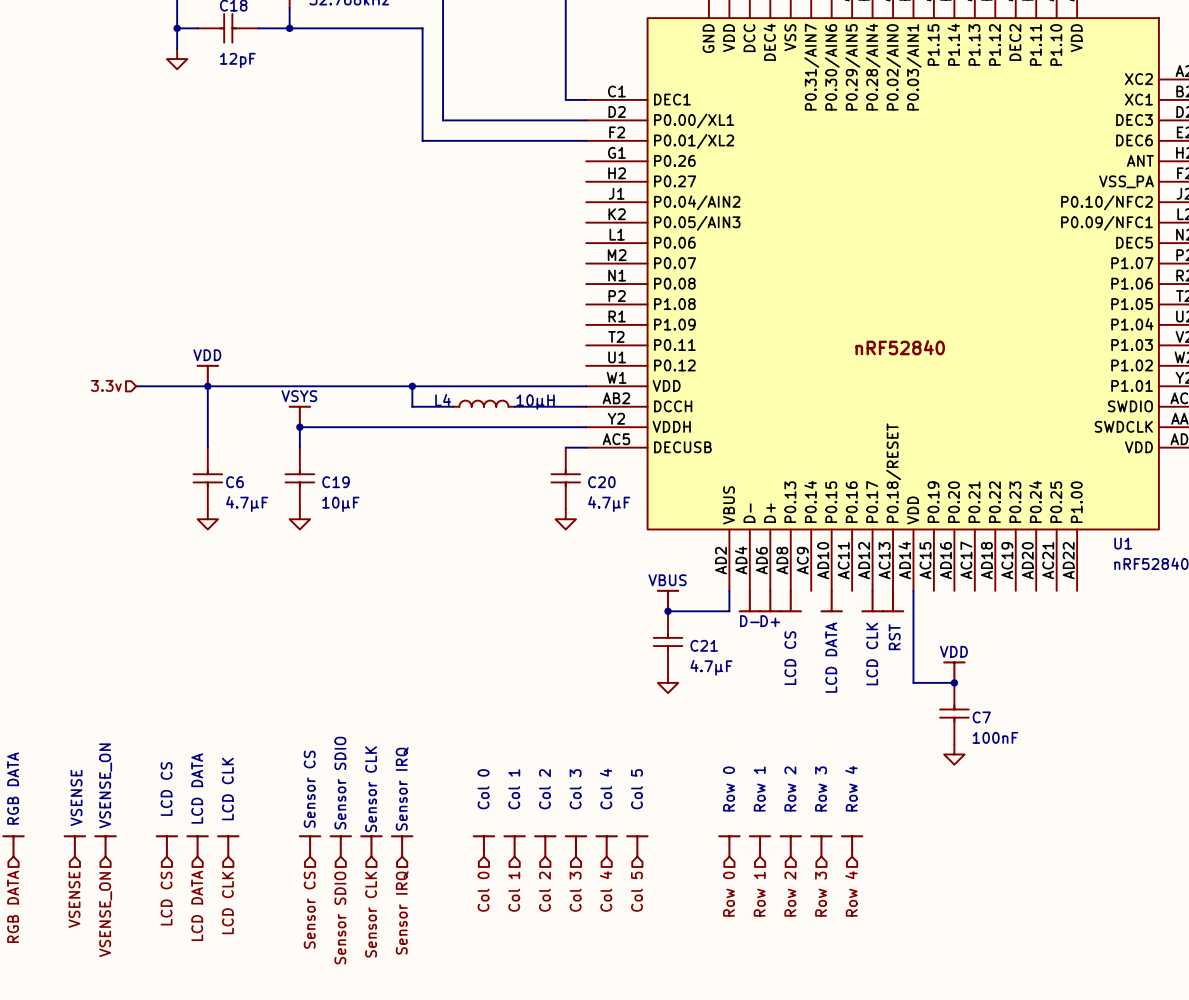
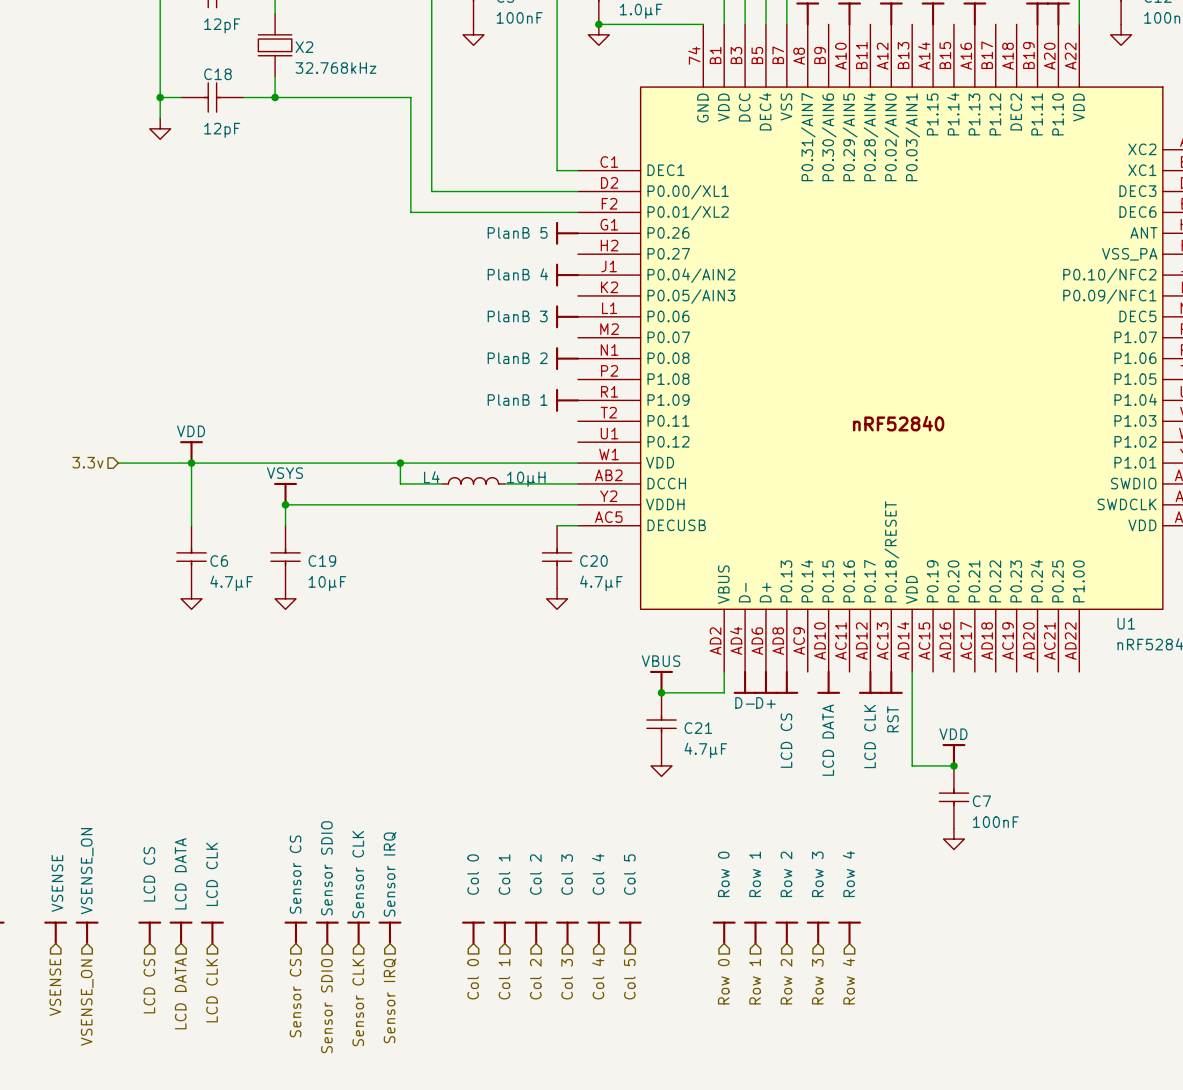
power symbol: none -> PlanB 5 (567, 233)
power symbol: none -> PlanB 4 (567, 275)
power symbol: none -> PlanB 3 (567, 316)
power symbol: none -> PlanB 2 (567, 358)
power symbol: none -> PlanB 1 (567, 400)

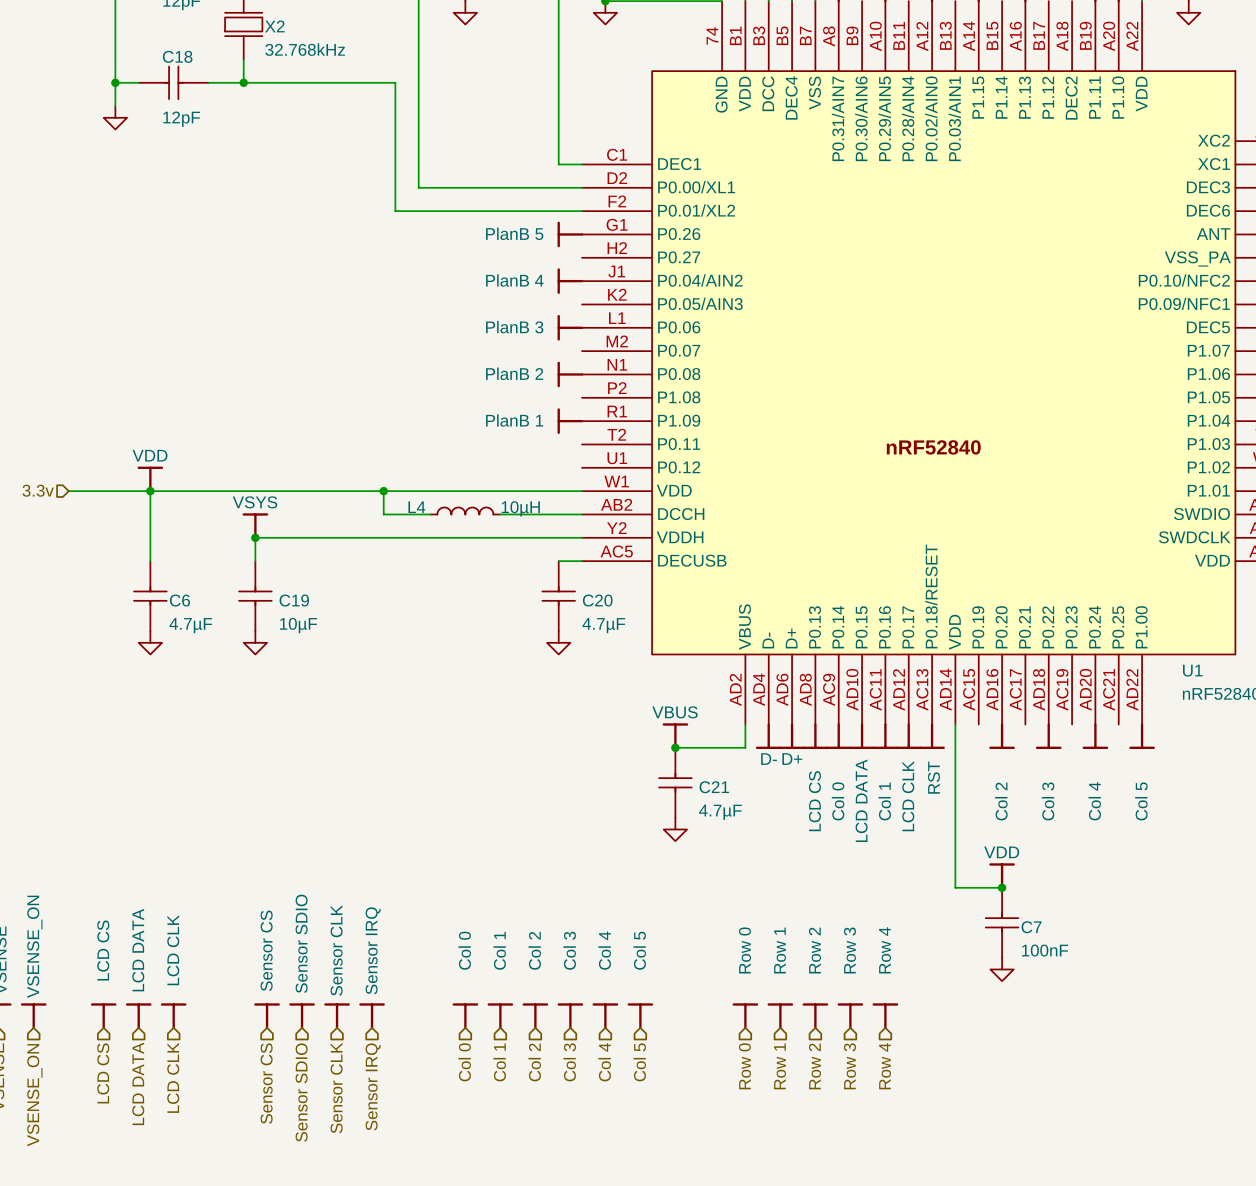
power symbol: none -> Col 0 (838, 736)
power symbol: none -> Col 1 (885, 736)
power symbol: none -> Col 2 (1002, 736)
power symbol: none -> Col 3 (1048, 736)
power symbol: none -> Col 4 (1095, 736)
power symbol: none -> Col 5 (1142, 736)
power symbol position: VDD (953, 755) -> VDD (1002, 876)
wire: (912, 765) (953, 765) -> (955, 829) (955, 887) (1002, 887)
junction: (953, 765) -> none
C7 position: (953, 797) -> (1002, 922)
junction: none -> (1002, 887)
power symbol position: (953, 839) -> (1002, 969)

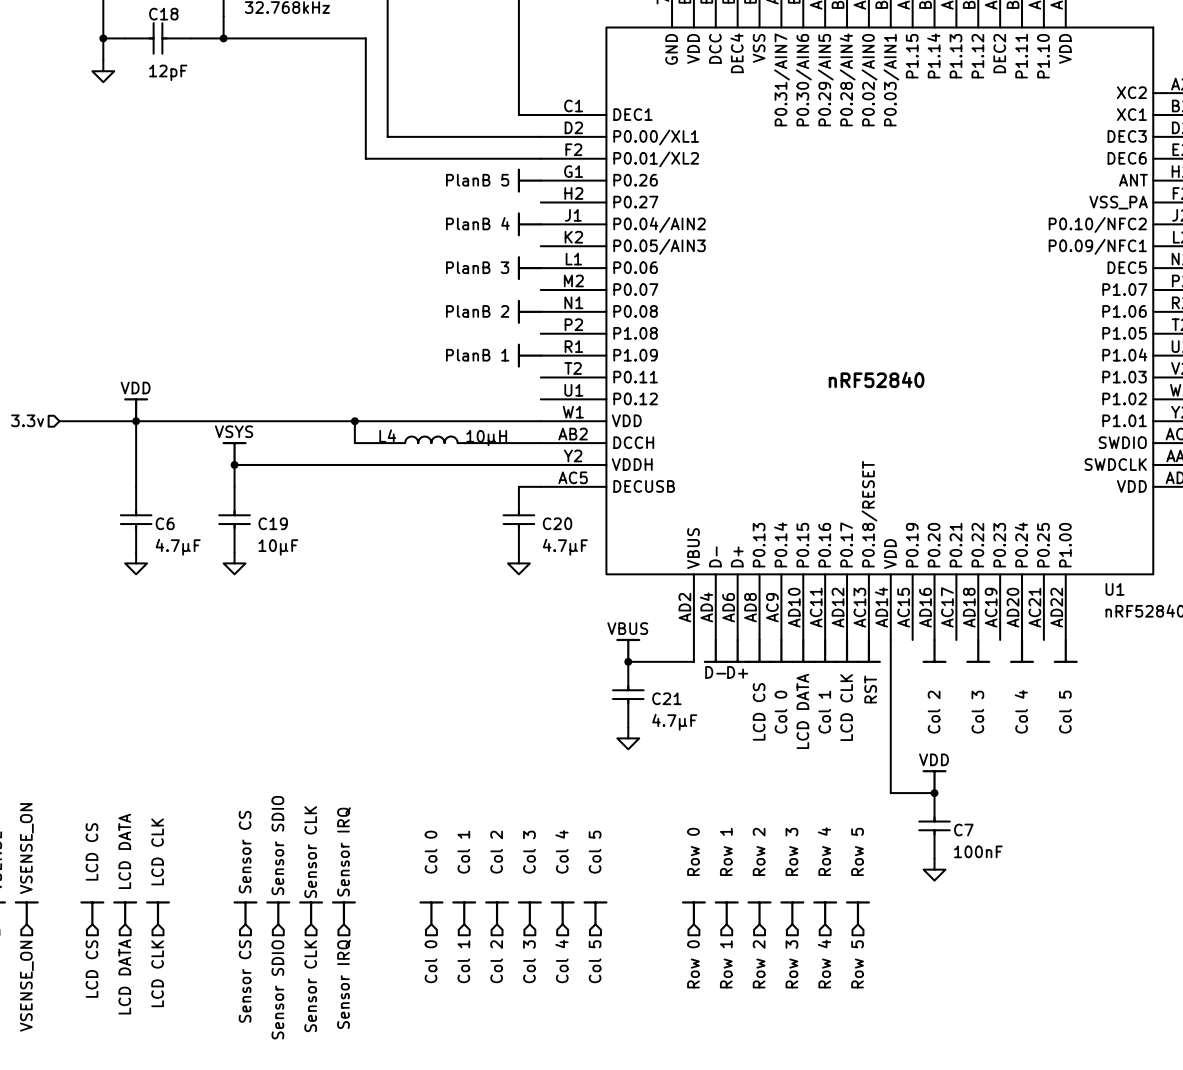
power symbol: none -> Row 5 (857, 913)
hierarchical label: none -> Row 5 (857, 964)

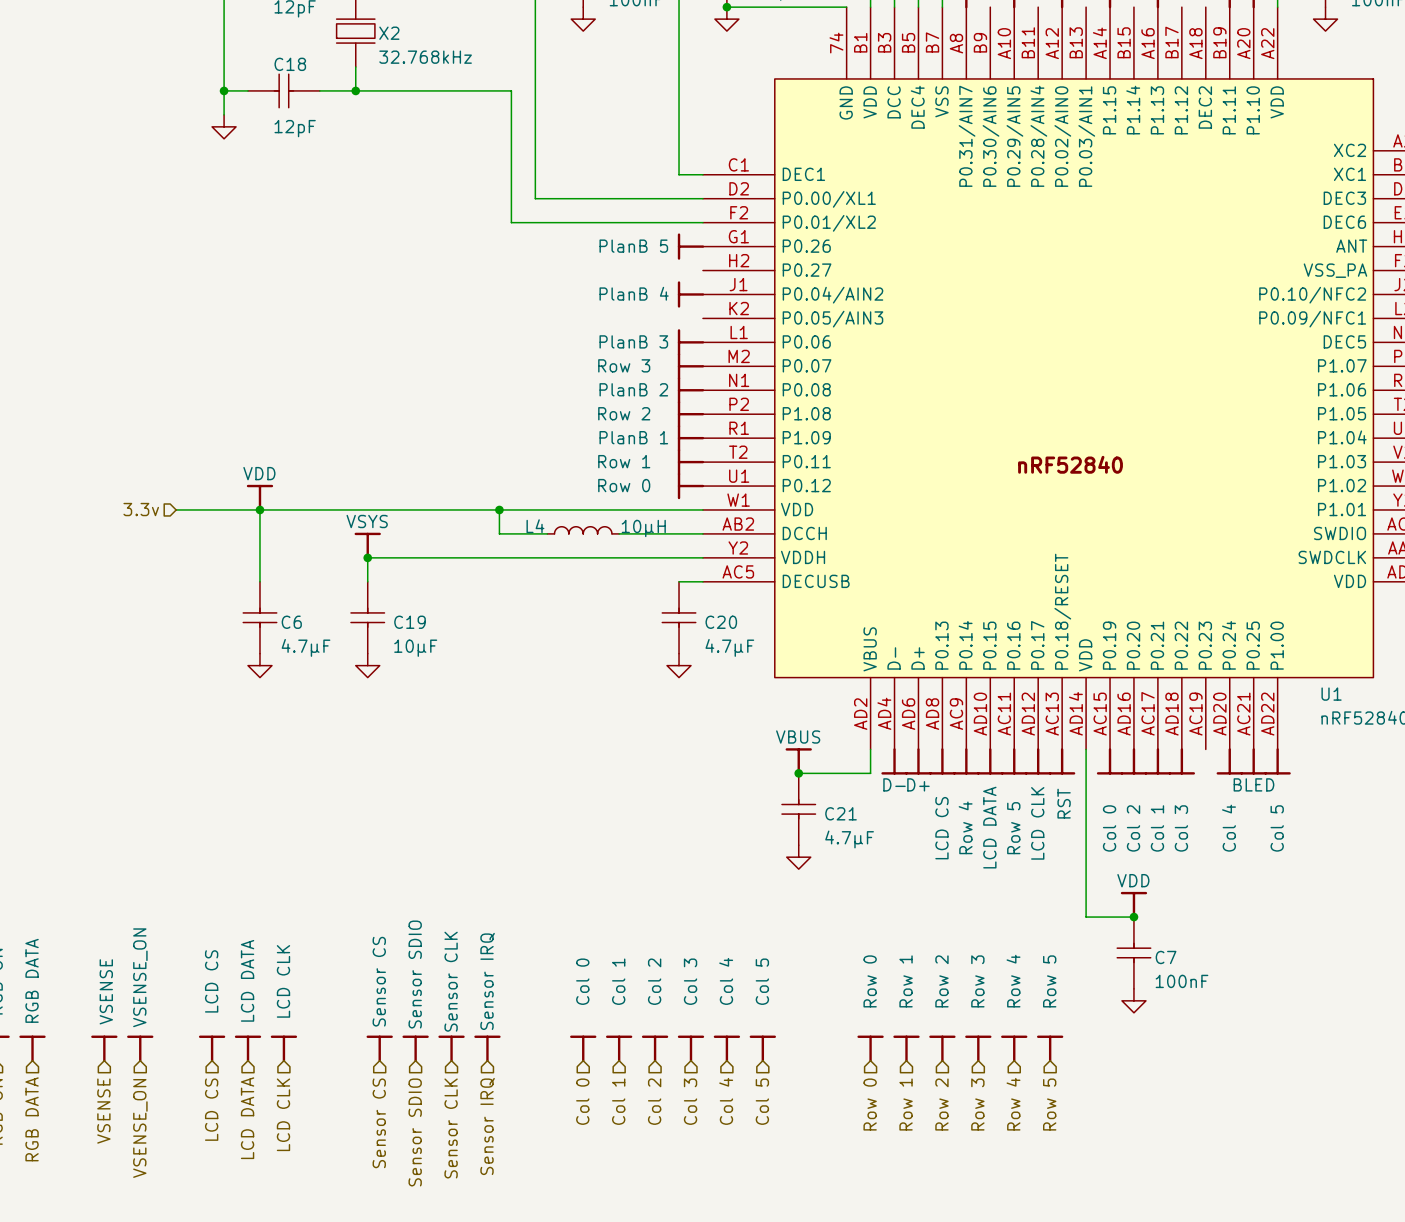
power symbol: none -> Row 3 (690, 366)
power symbol: none -> Row 2 (690, 414)
power symbol: none -> Row 1 (690, 462)
power symbol: none -> Row 0 (690, 486)
power symbol: Col 0 (781, 650) -> Row 4 (966, 761)
power symbol: Col 1 (825, 650) -> Row 5 (1014, 761)
power symbol: none -> Col 0 (1110, 761)
power symbol: none -> Col 1 (1157, 761)
power symbol: none -> BLED (1253, 761)

